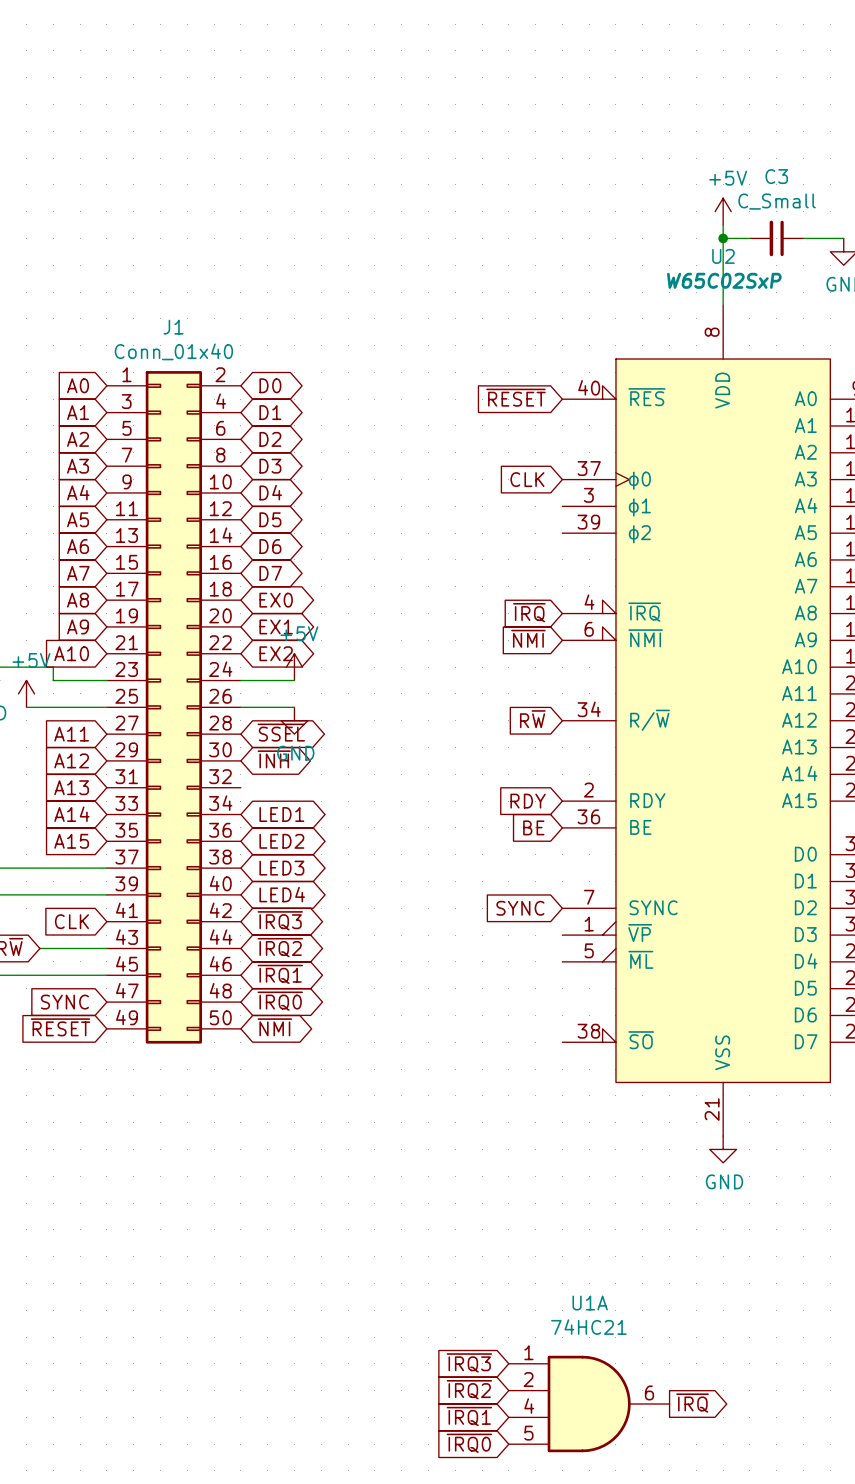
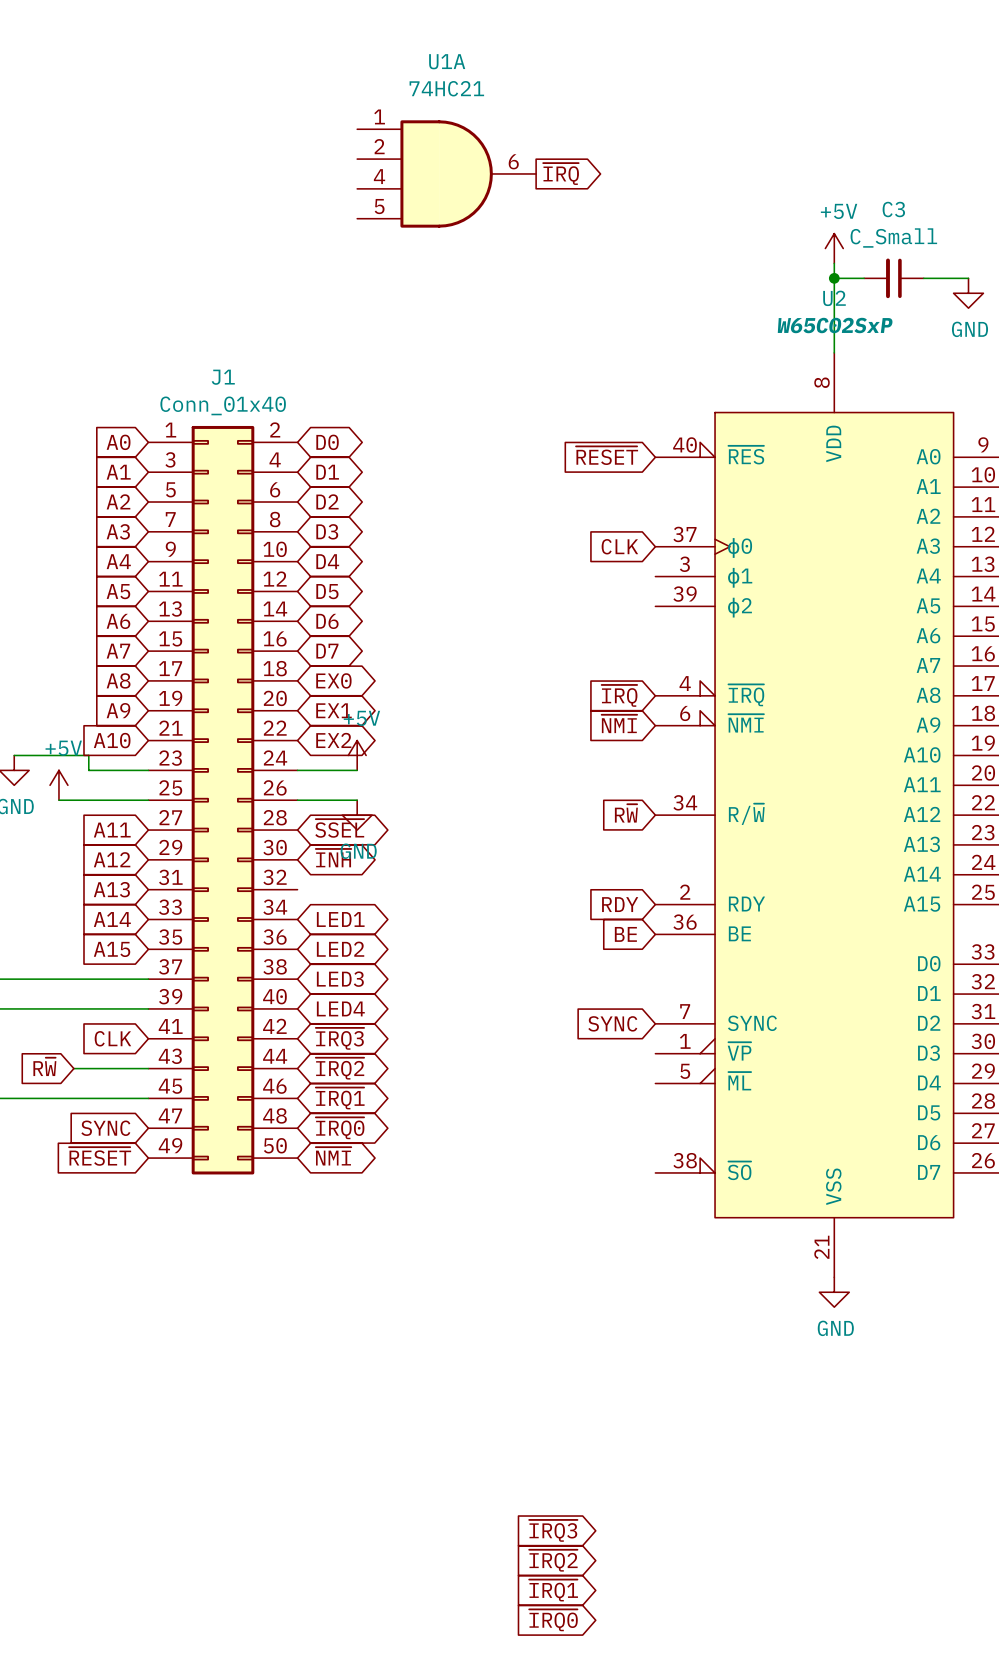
global label: none -> ~{IRQ} (561, 174)
U1A position: (589, 1403) -> (446, 173)
global label: ~{IRQ} (692, 1403) -> none

